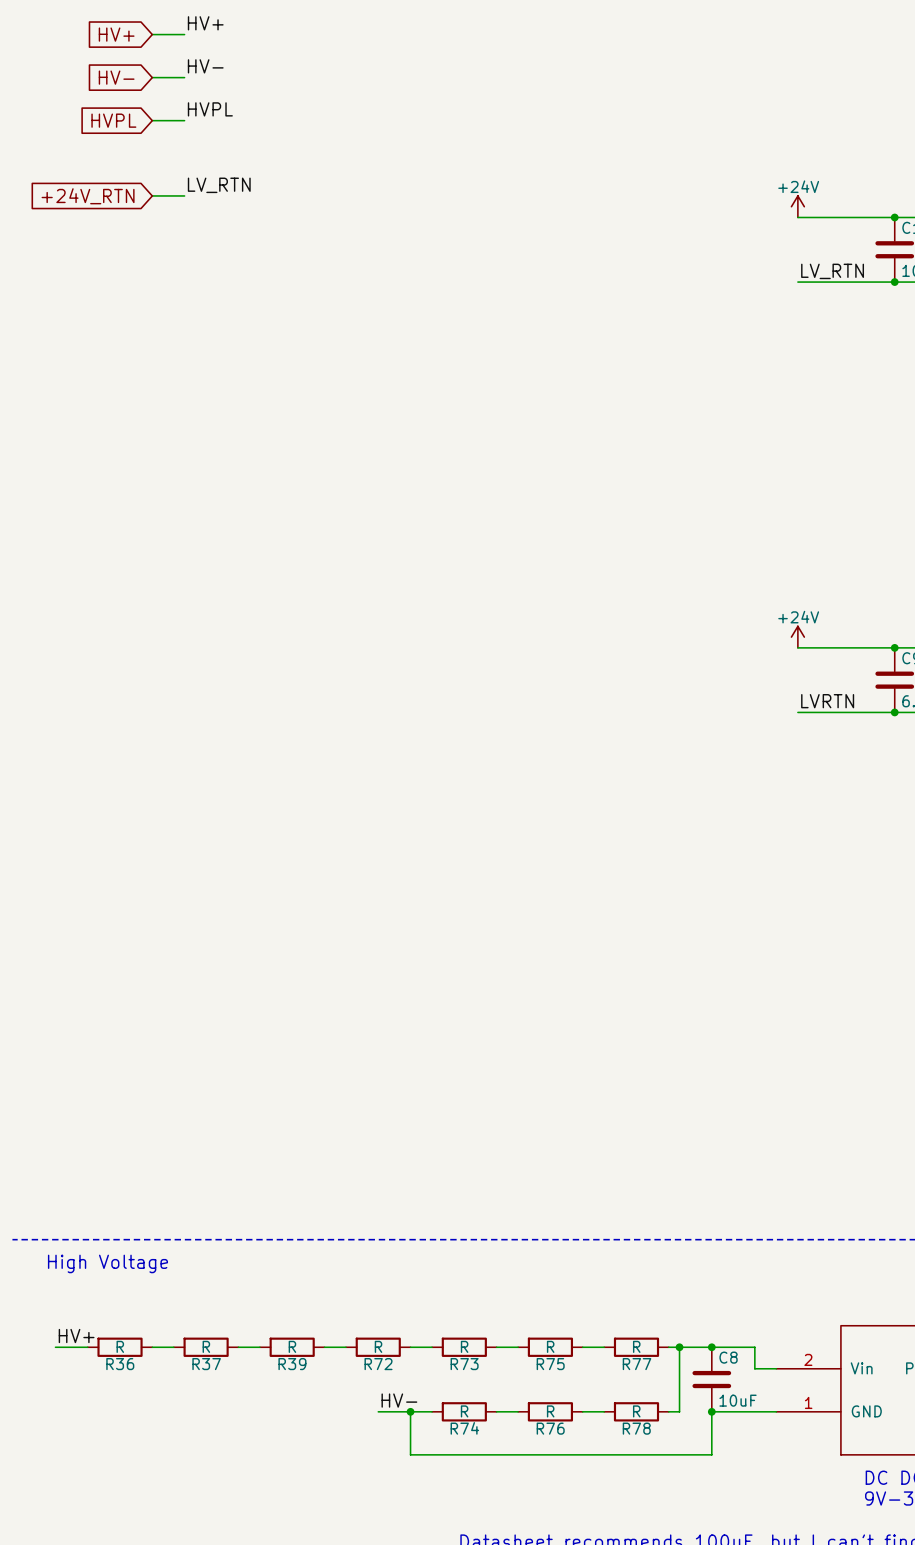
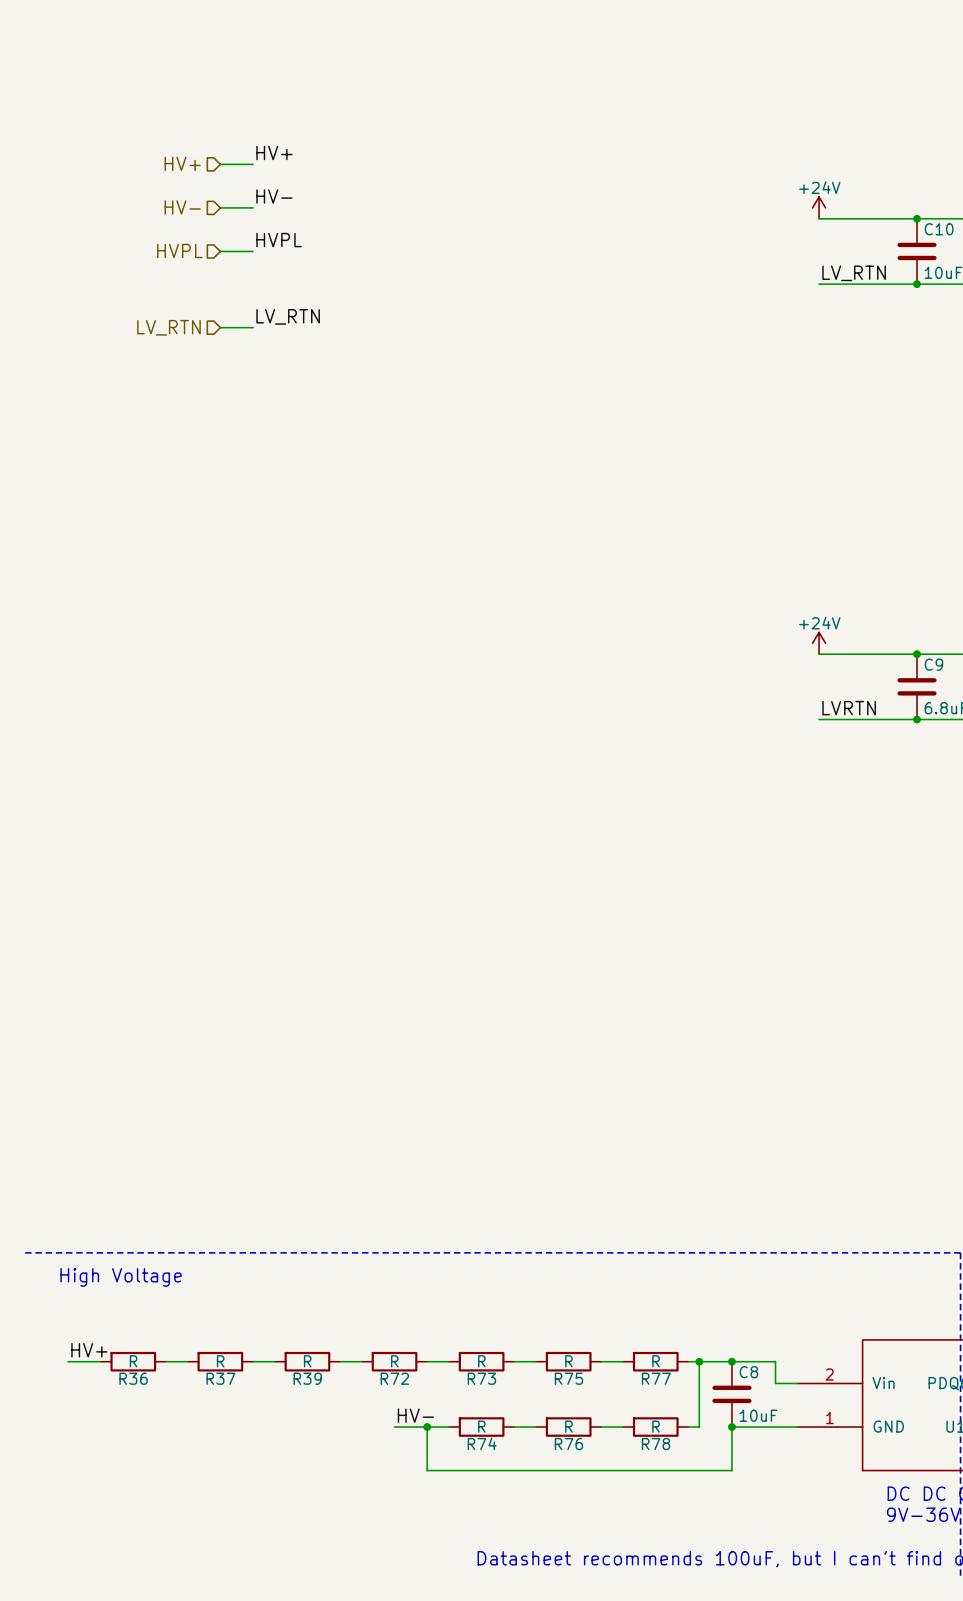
label position: HV+ (205, 23) -> HV+ (274, 152)
global label: HV+ (116, 34) -> none
wire: (152, 34) (184, 34) -> (220, 164) (253, 164)
label position: HV- (205, 66) -> HV- (274, 196)
global label: HV- (116, 77) -> none
wire: (152, 77) (184, 77) -> (220, 207) (253, 207)
label position: HVPL (210, 109) -> HVPL (279, 240)
global label: HVPL (113, 120) -> none
wire: (152, 120) (184, 120) -> (220, 251) (253, 251)
hierarchical label: none -> HV+ (182, 163)
label position: LV_RTN (219, 185) -> LV_RTN (288, 316)
wire: (152, 195) (184, 195) -> (220, 327) (253, 327)
global label: +24V_RTN (88, 196) -> none
hierarchical label: none -> HV- (182, 207)
hierarchical label: none -> HVPL (179, 250)
hierarchical label: none -> LV_RTN (168, 327)

